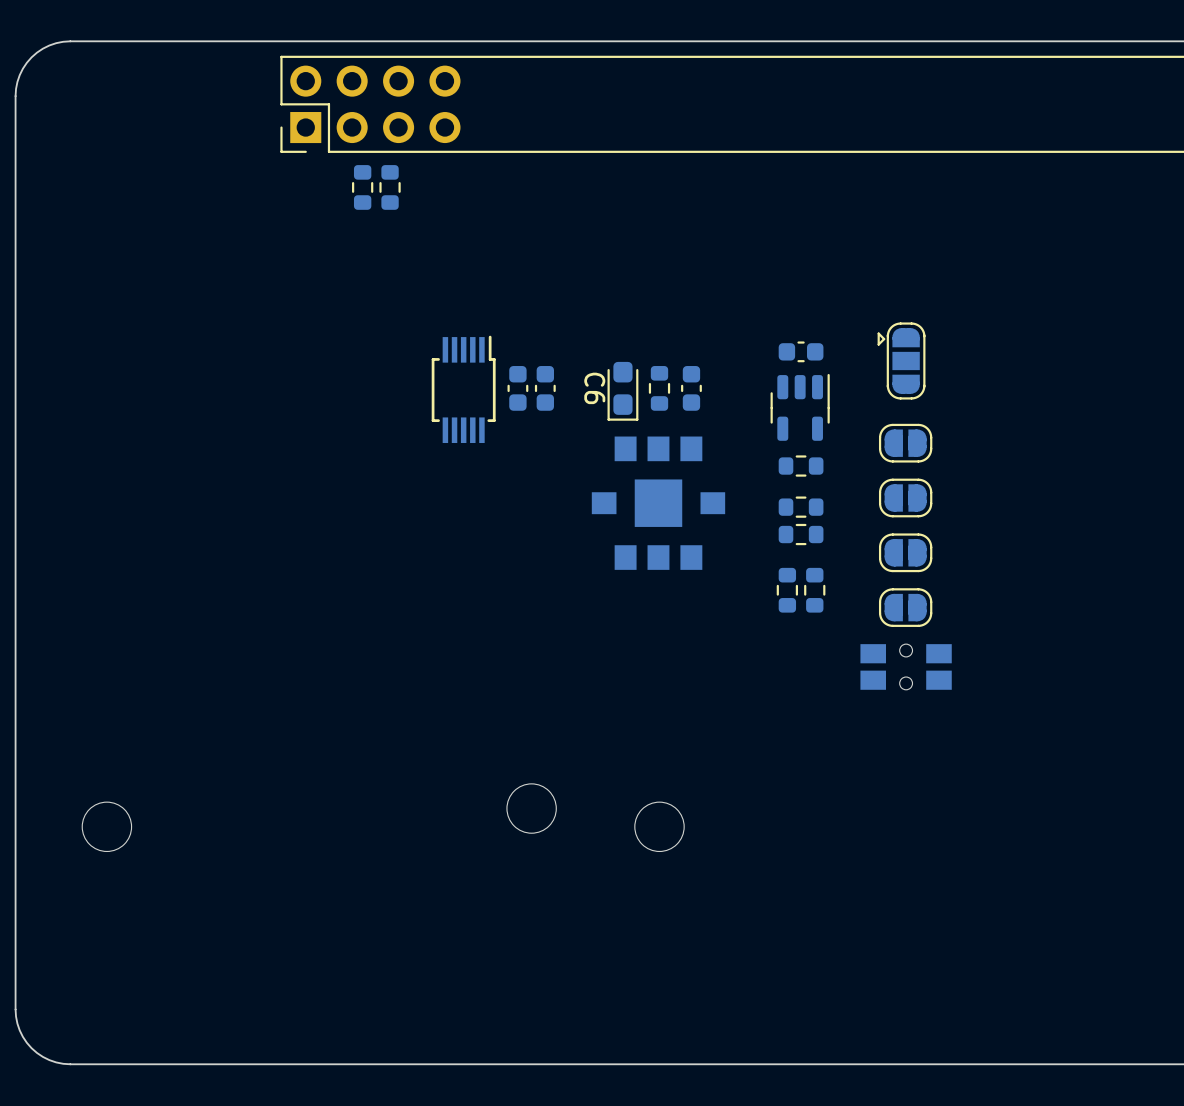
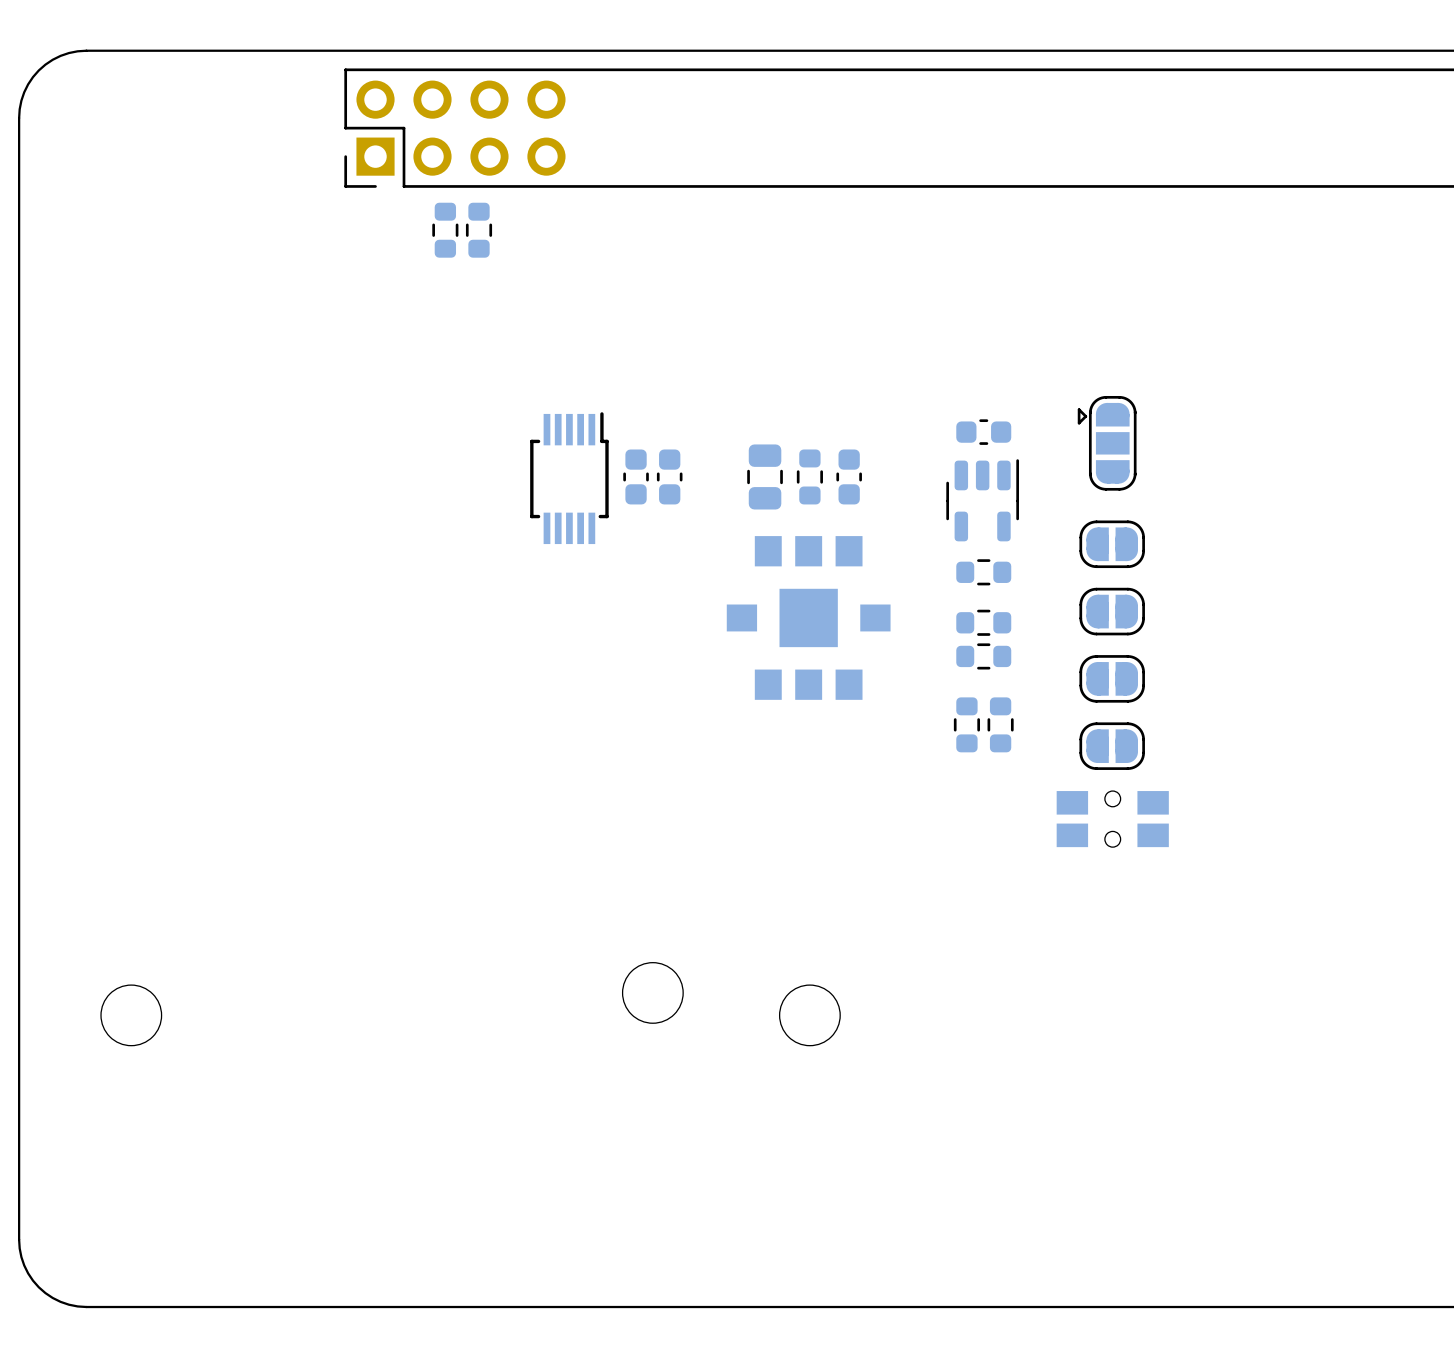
part: none -> (765, 476)
C6: (622, 391) -> none

